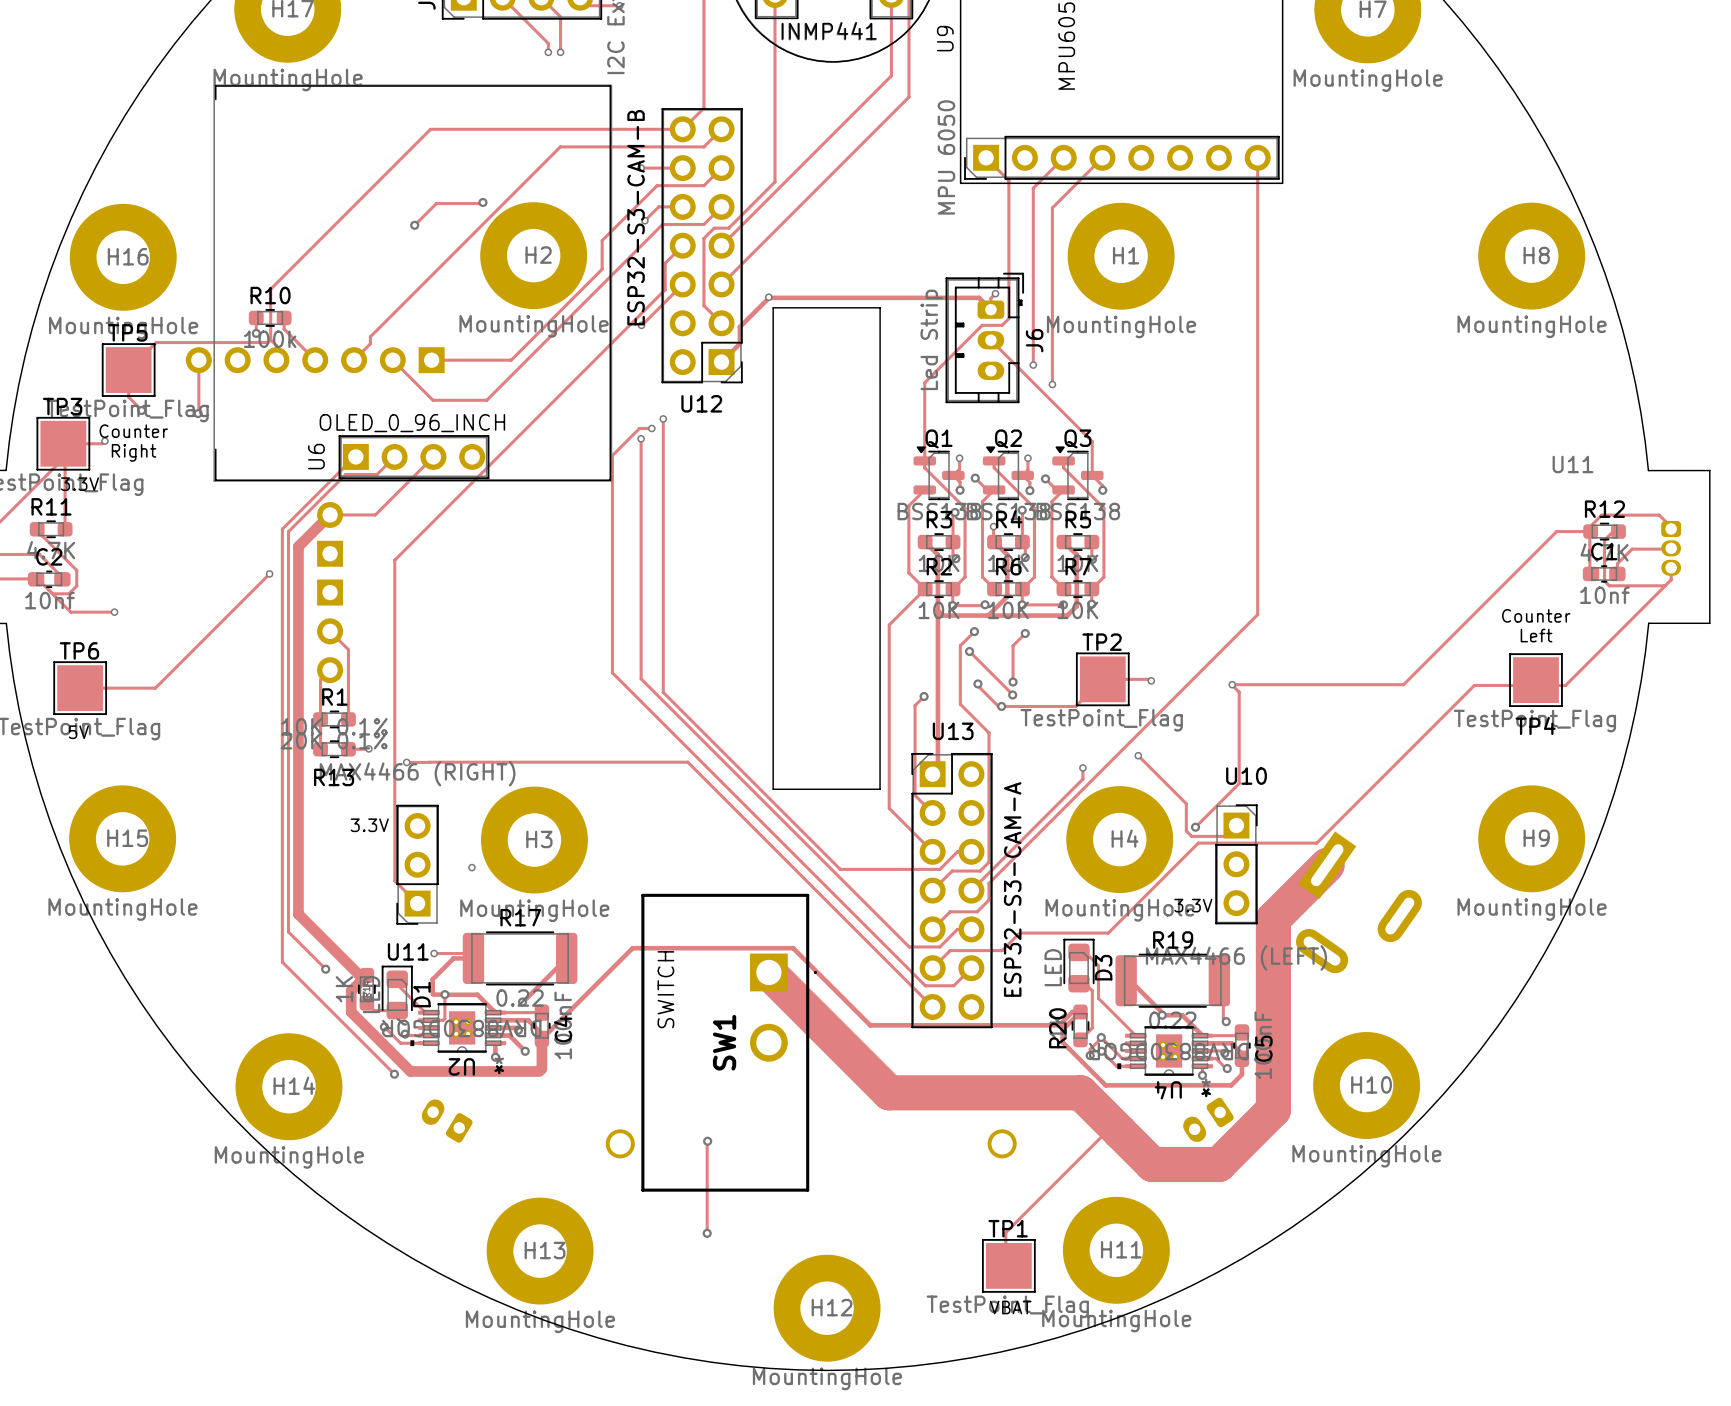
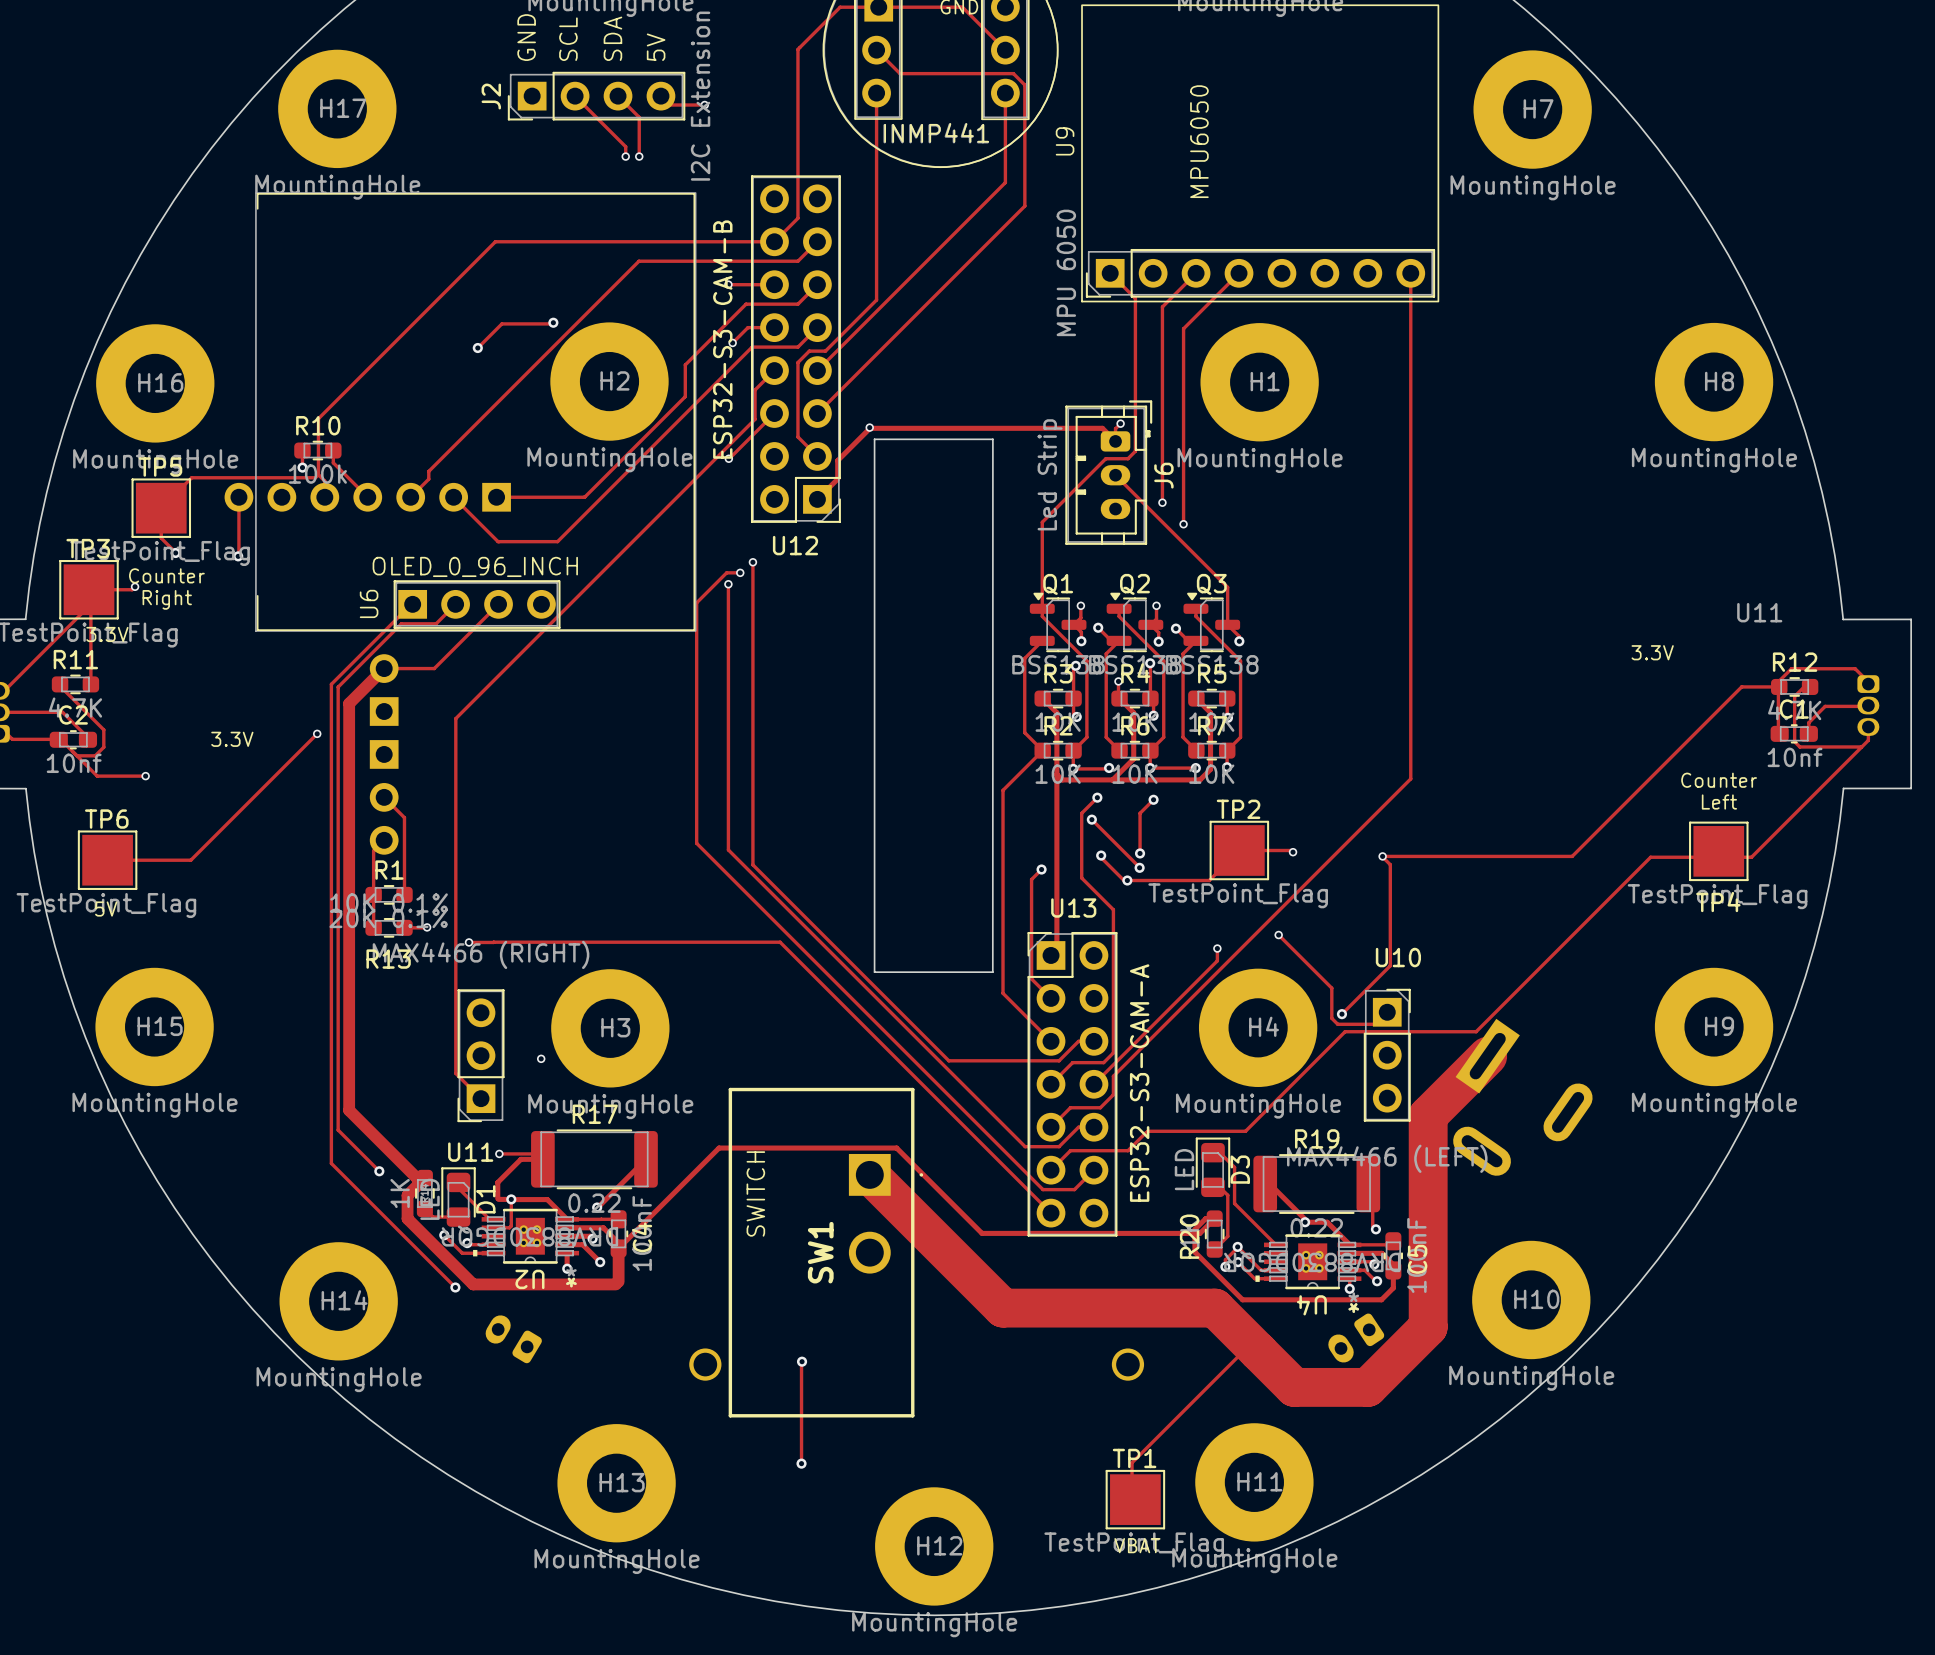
U12 footprint: [661, 108, 743, 384] -> [750, 175, 841, 523]
text: none -> 3.3V (1652, 652)
text position: 3.3V (369, 825) -> 3.3V (232, 739)
text: 3.3V (1193, 905) -> none

